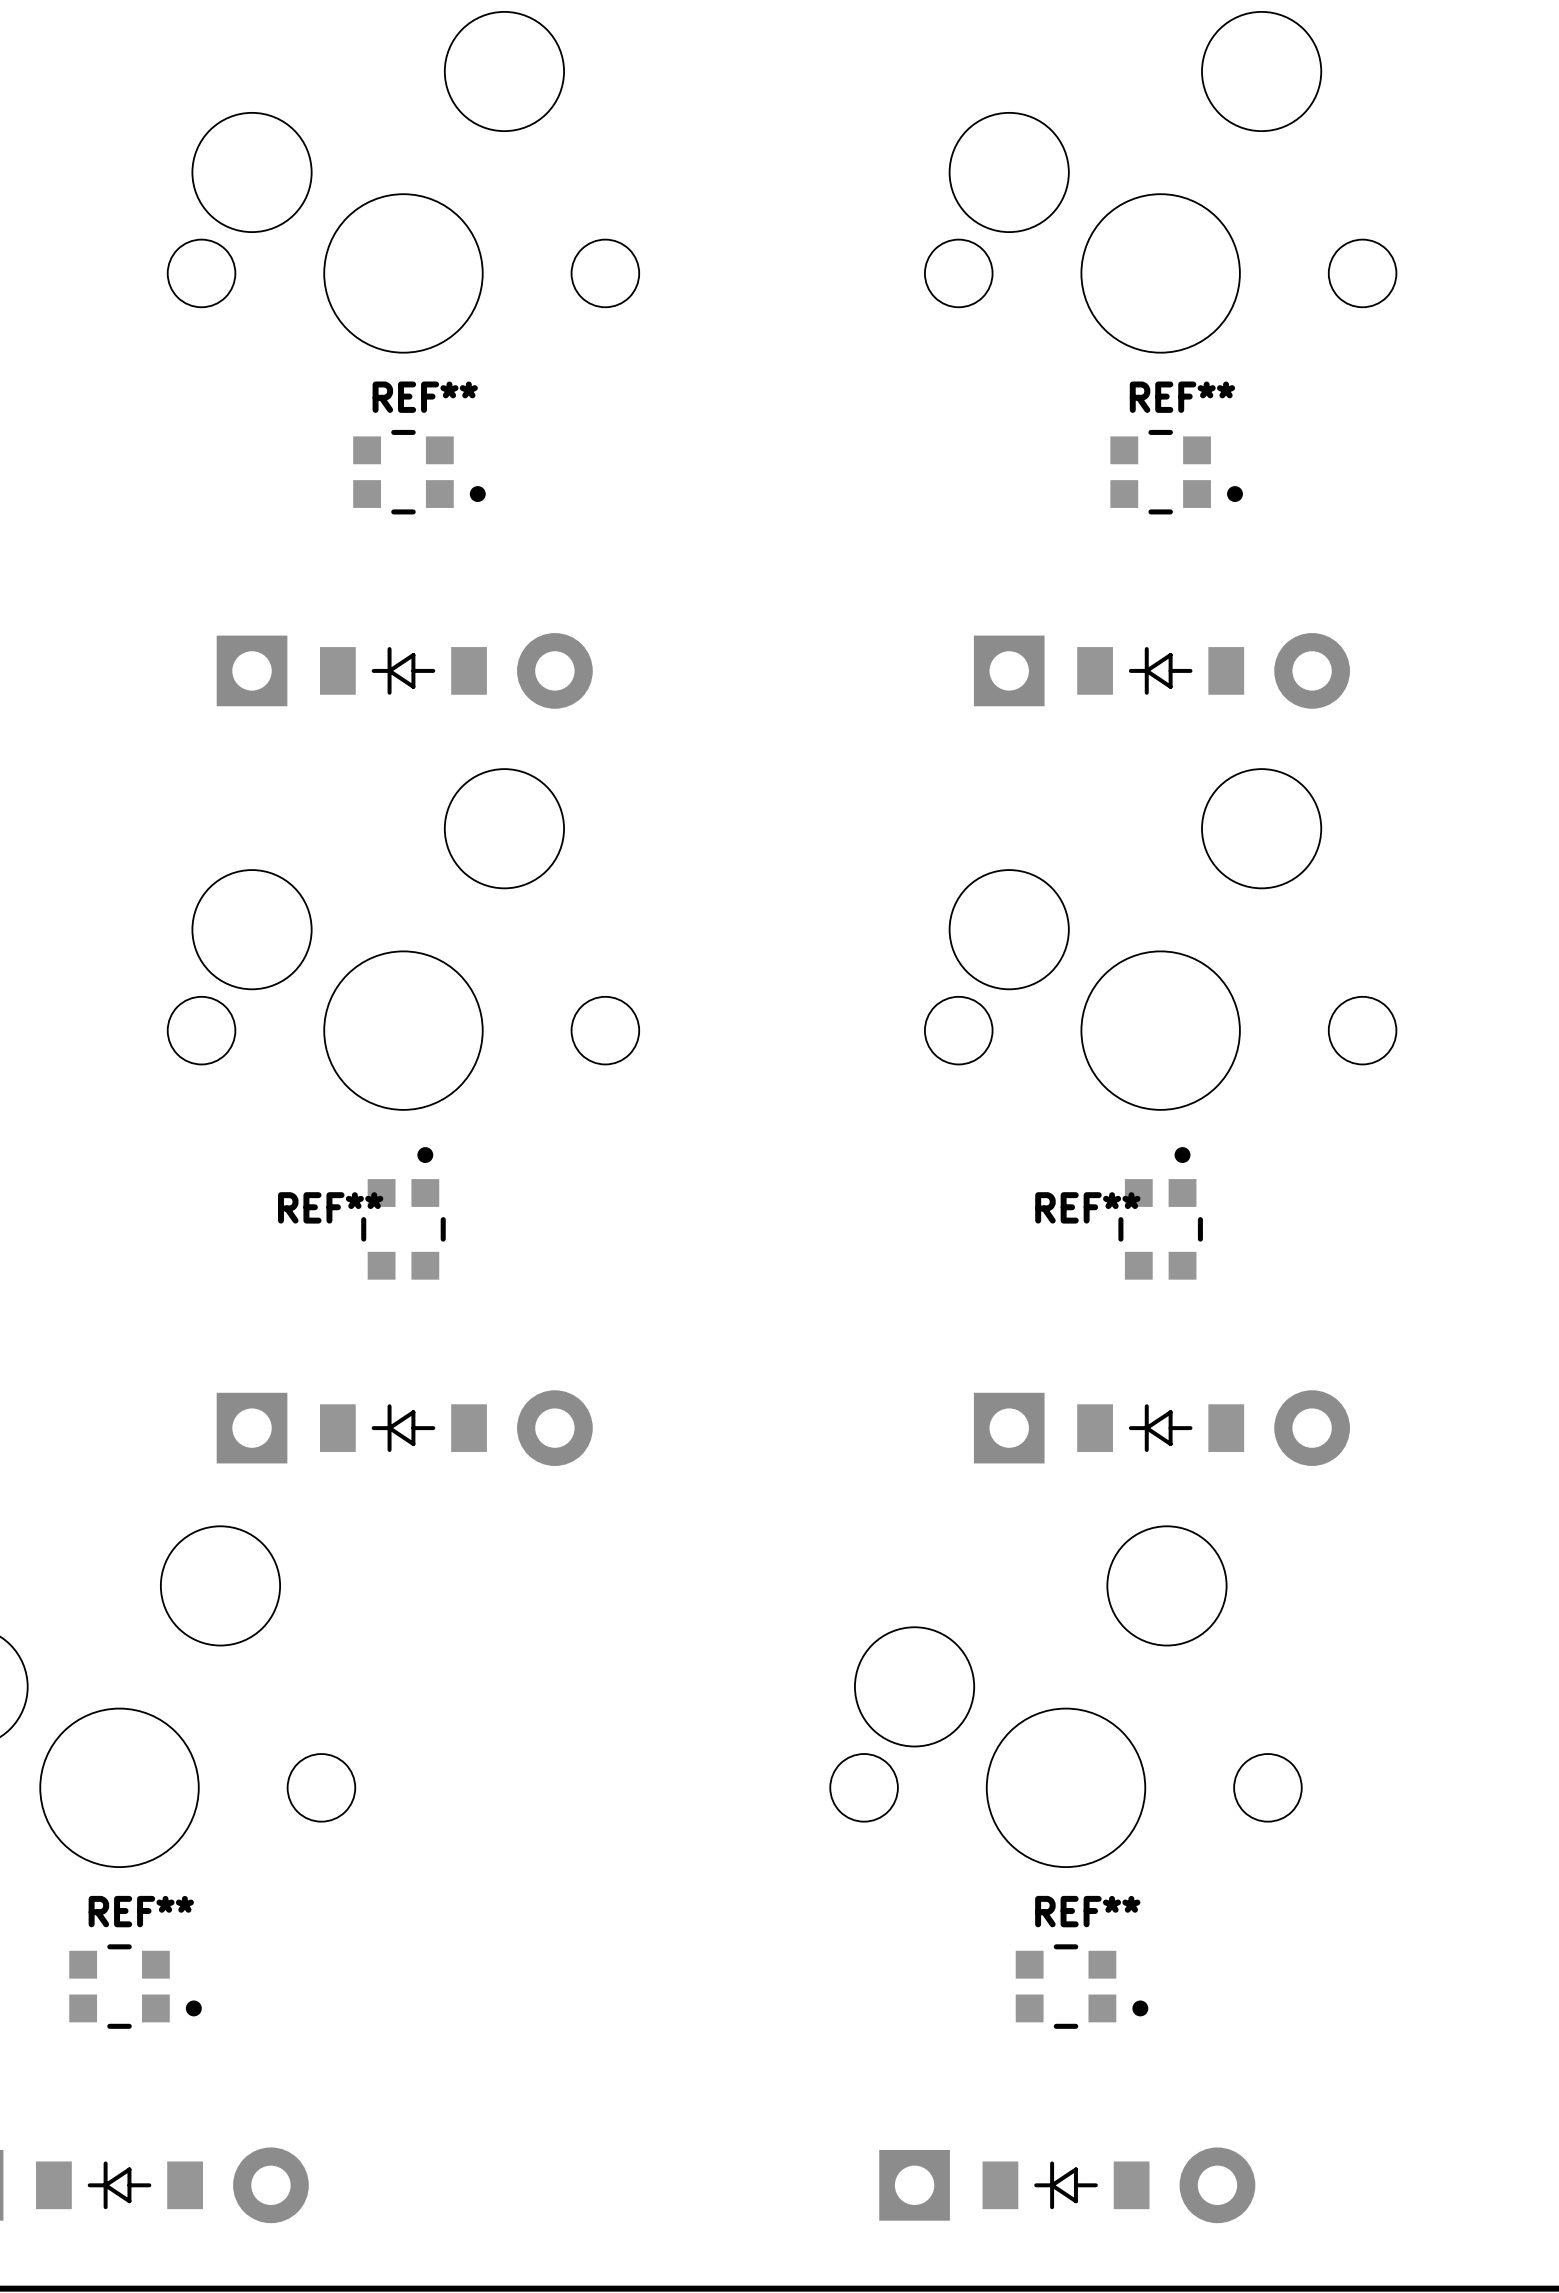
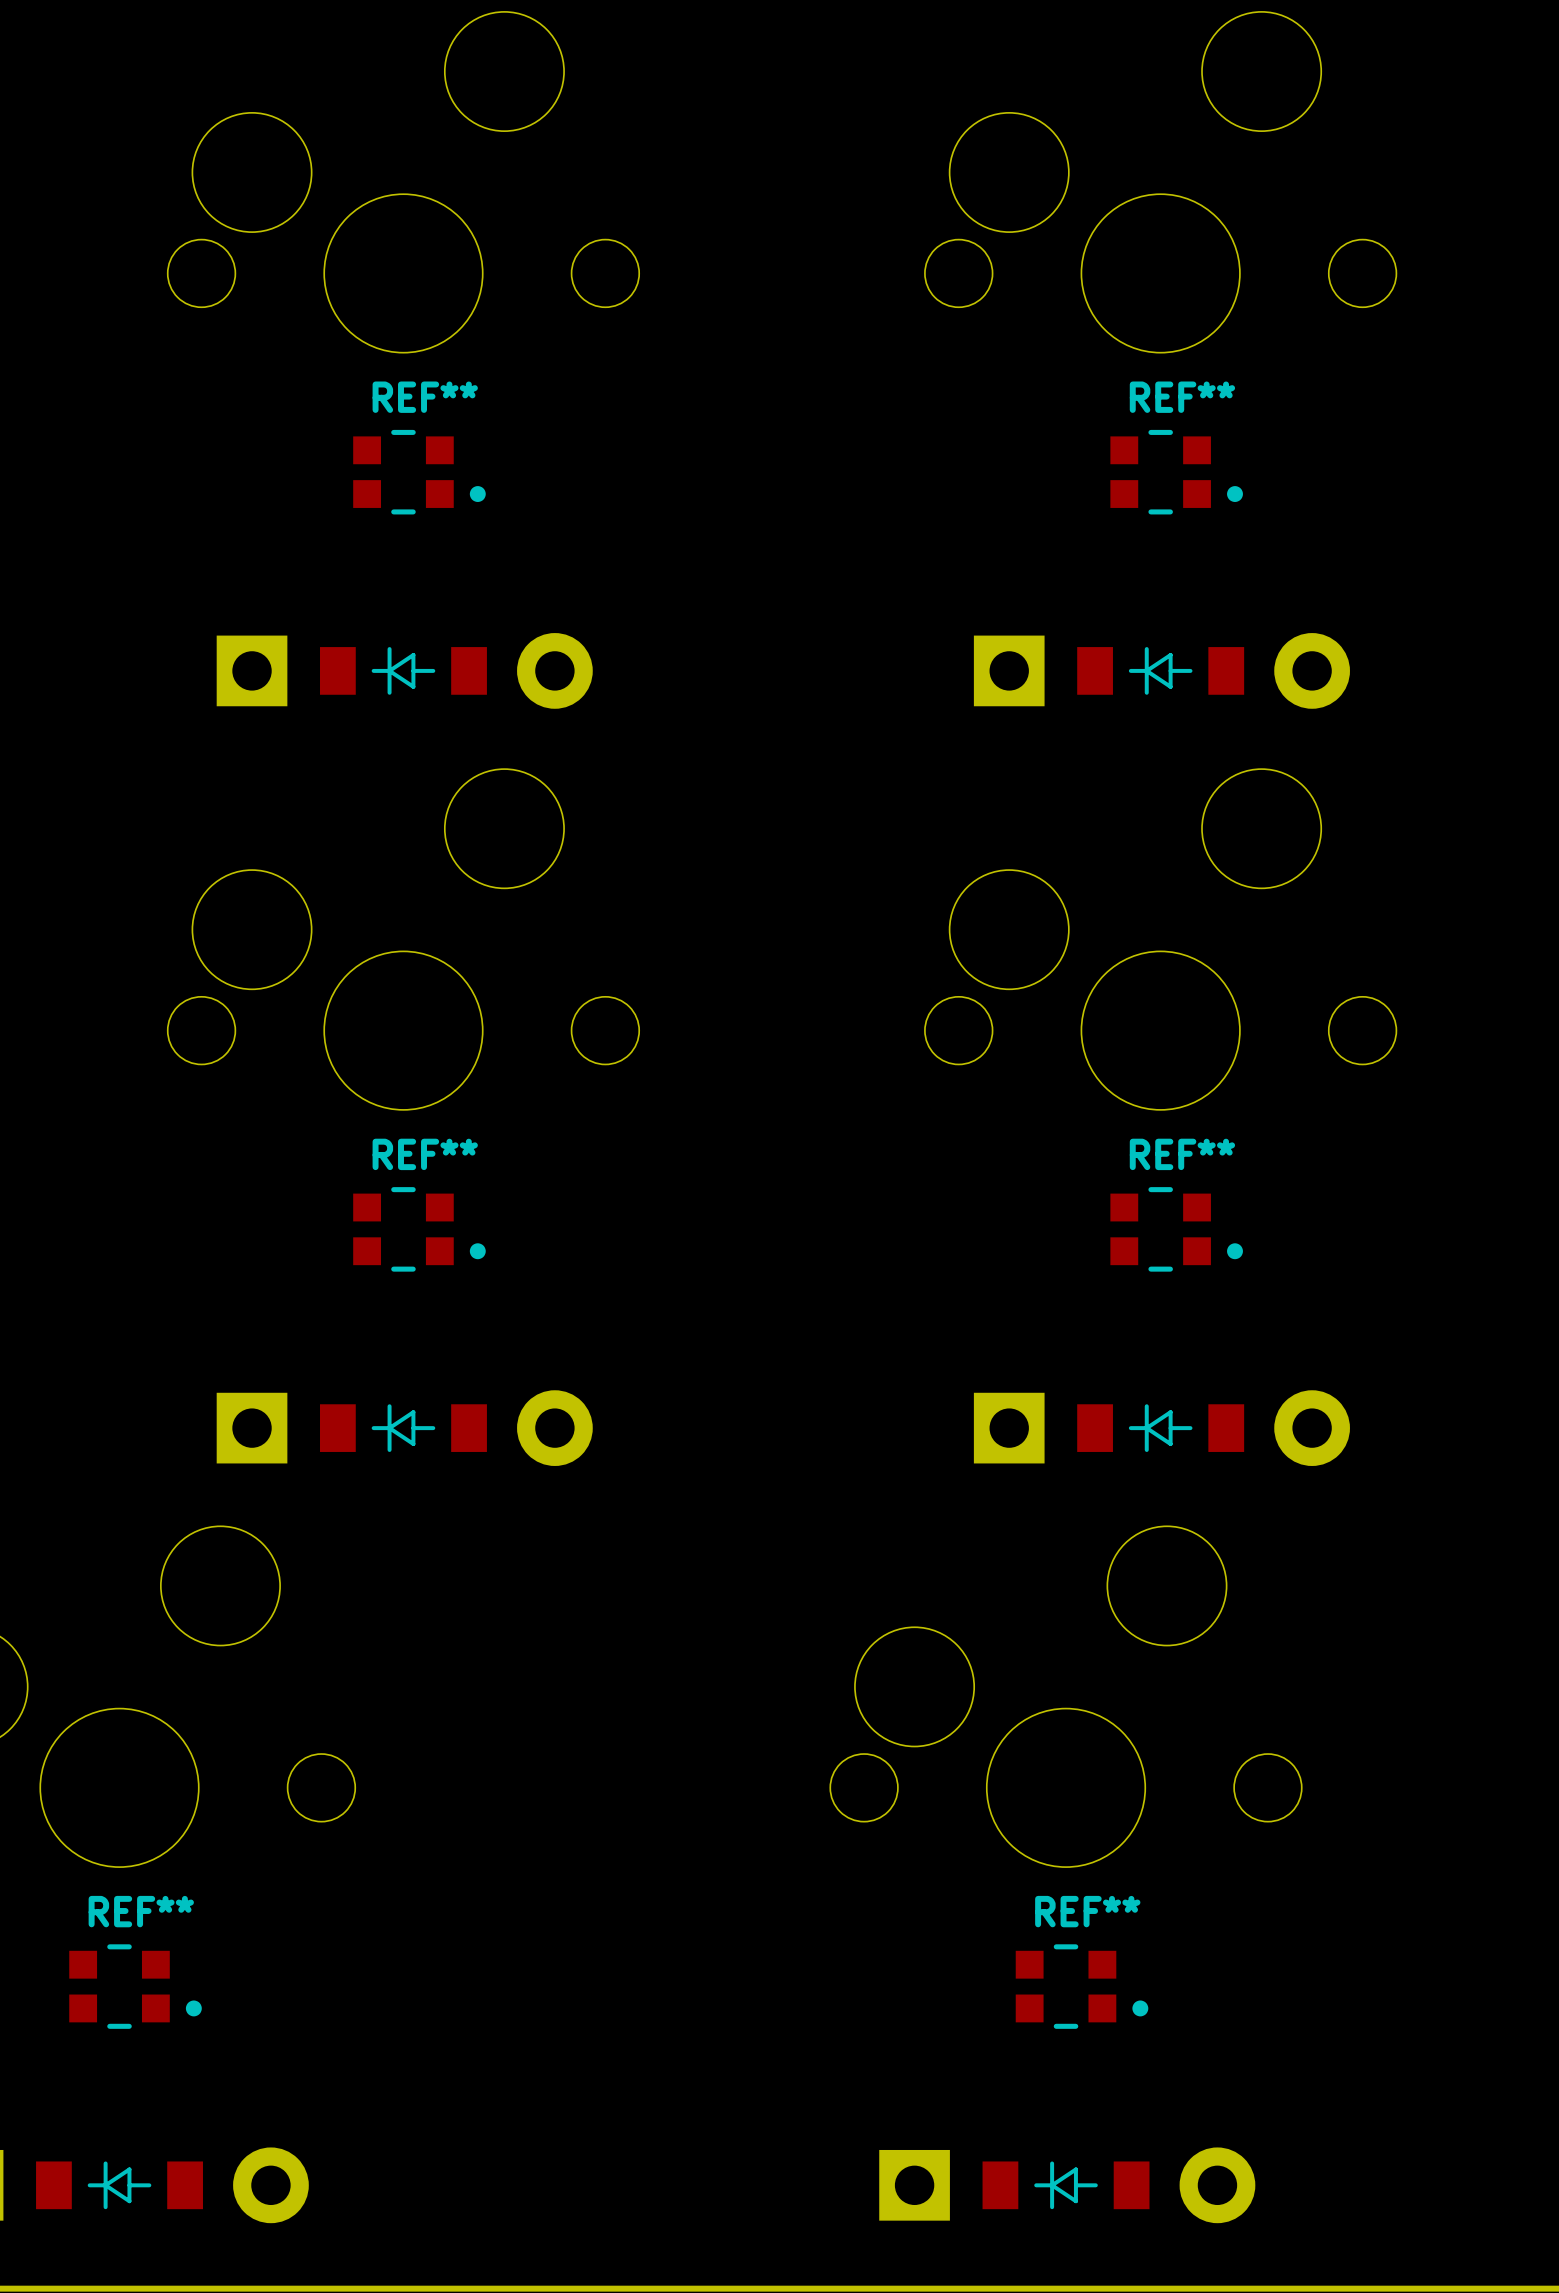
REF** rotation: 0° (403, 1213) -> 90° clockwise (419, 1229)
REF** rotation: 0° (1160, 1213) -> 90° clockwise (1176, 1229)

